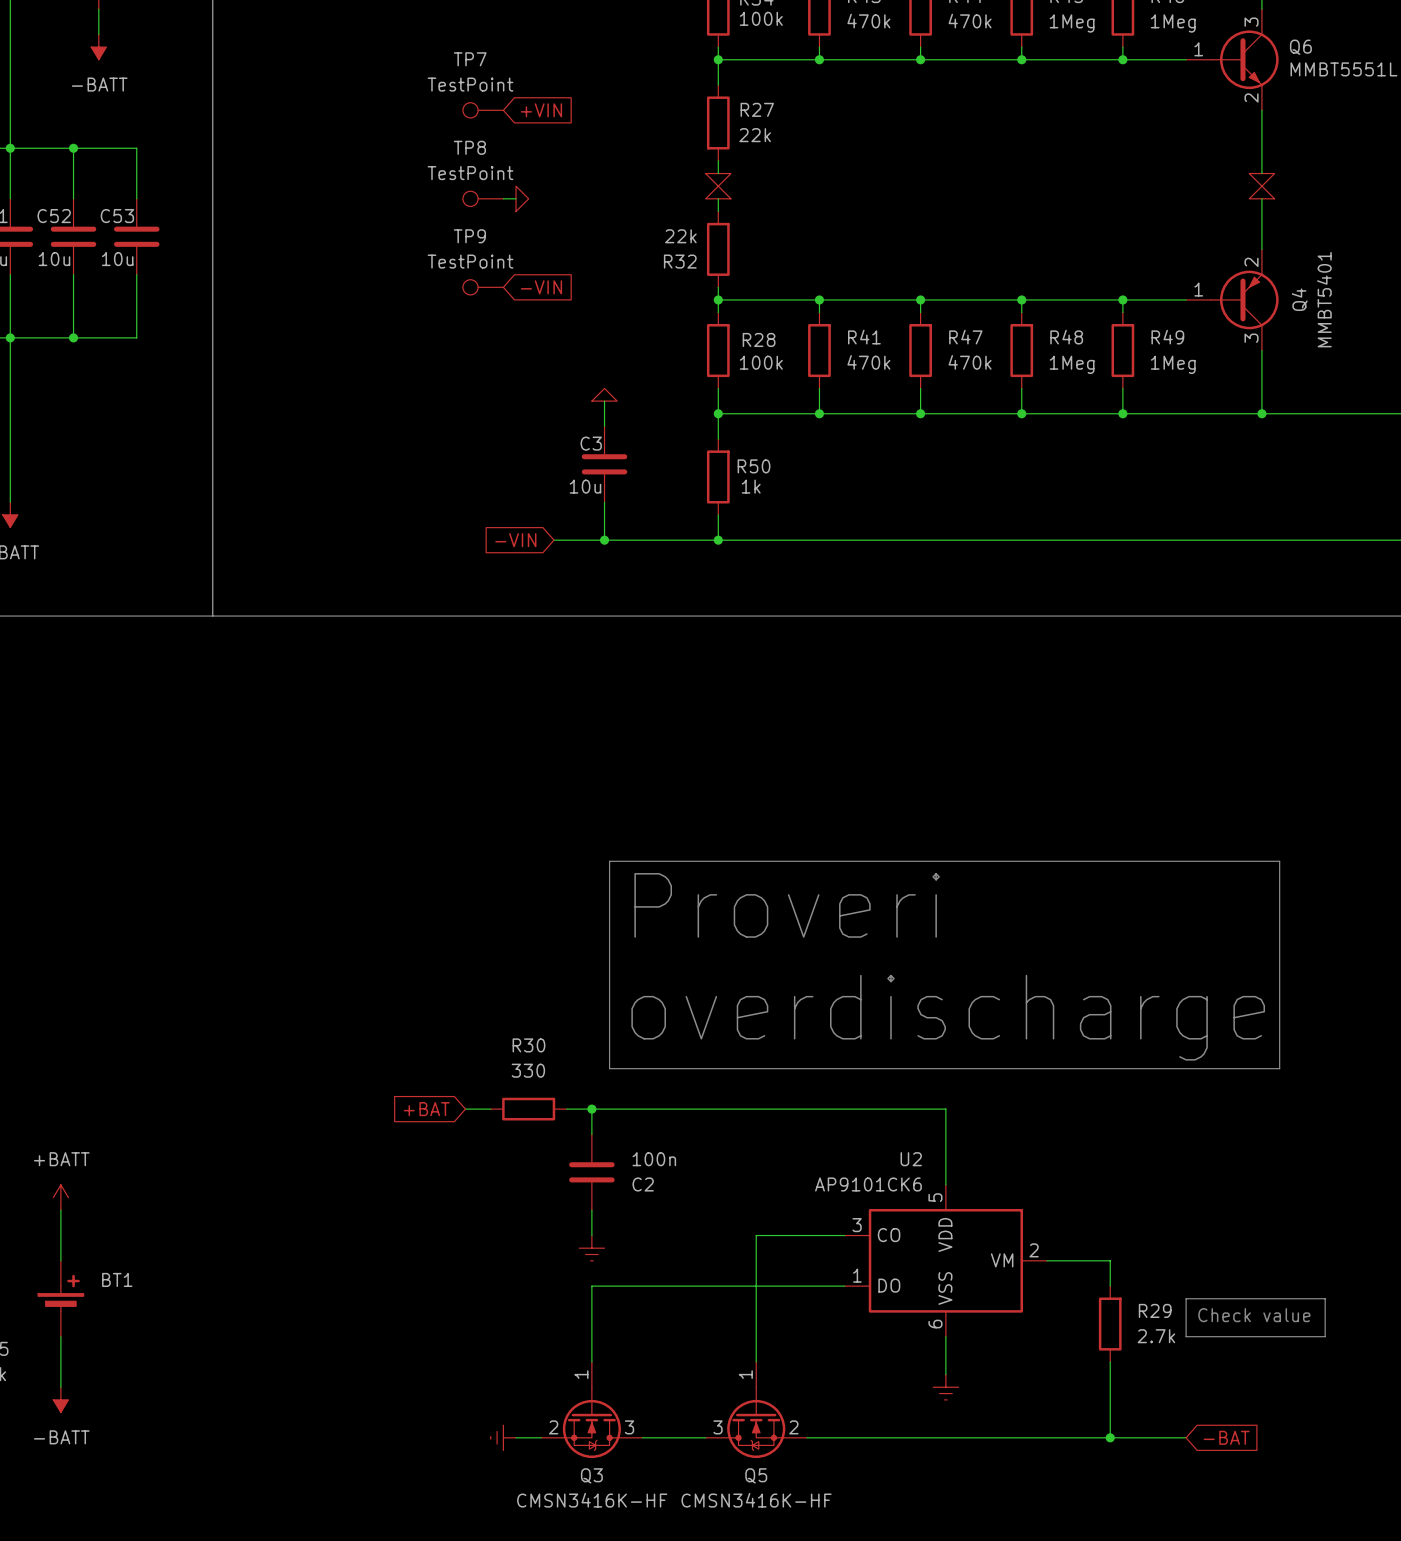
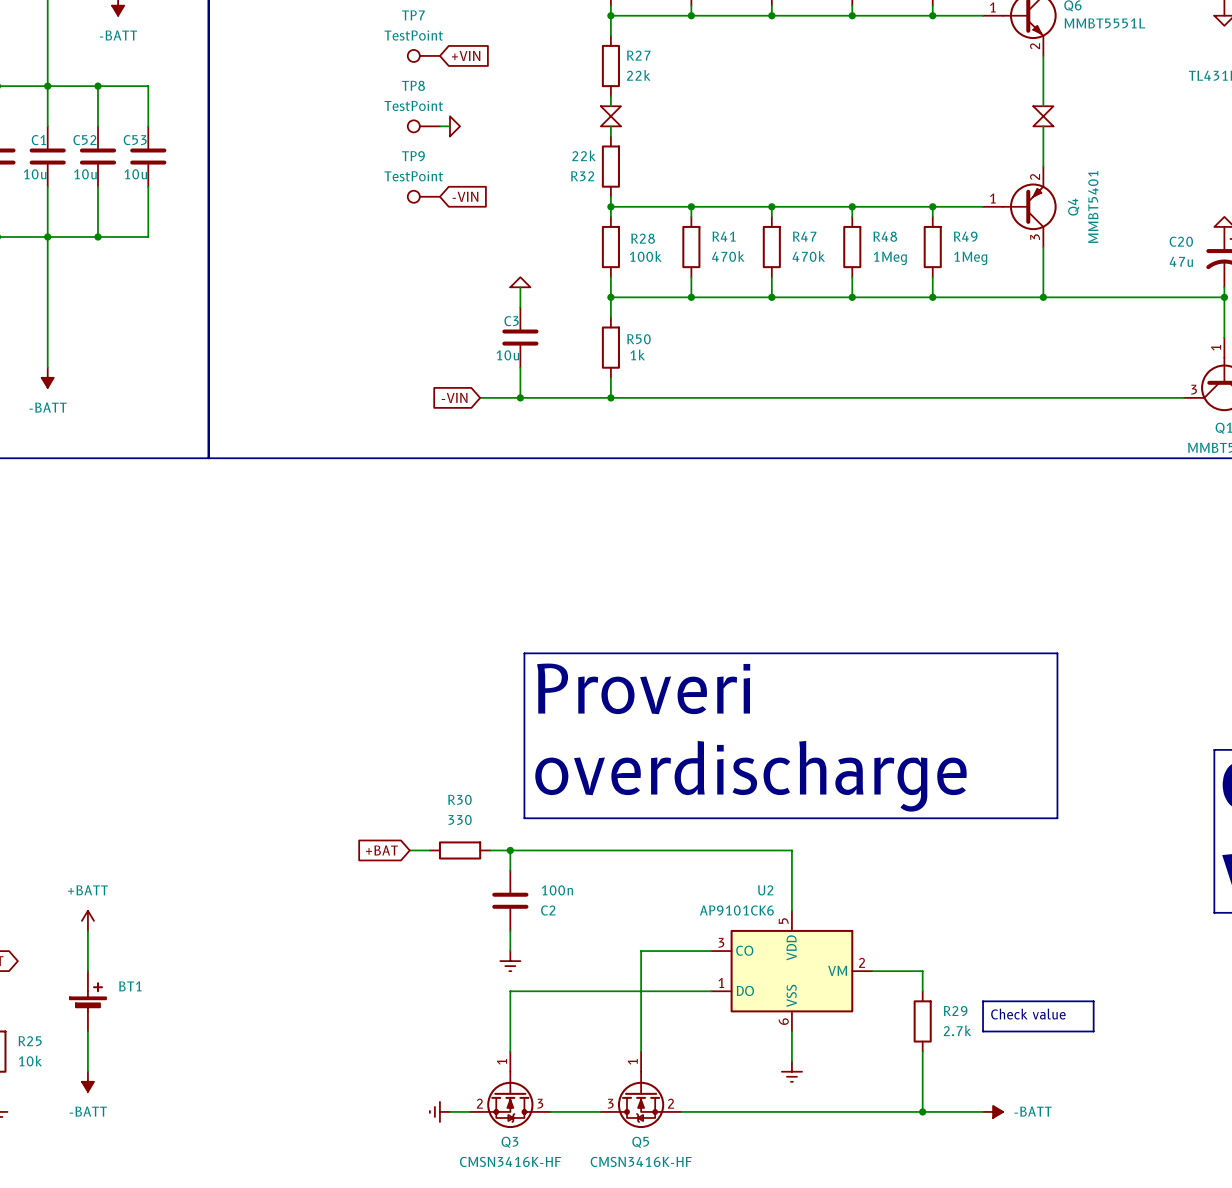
power symbol: none -> -BATT (993, 1111)
global label: -BAT (1226, 1437) -> none

